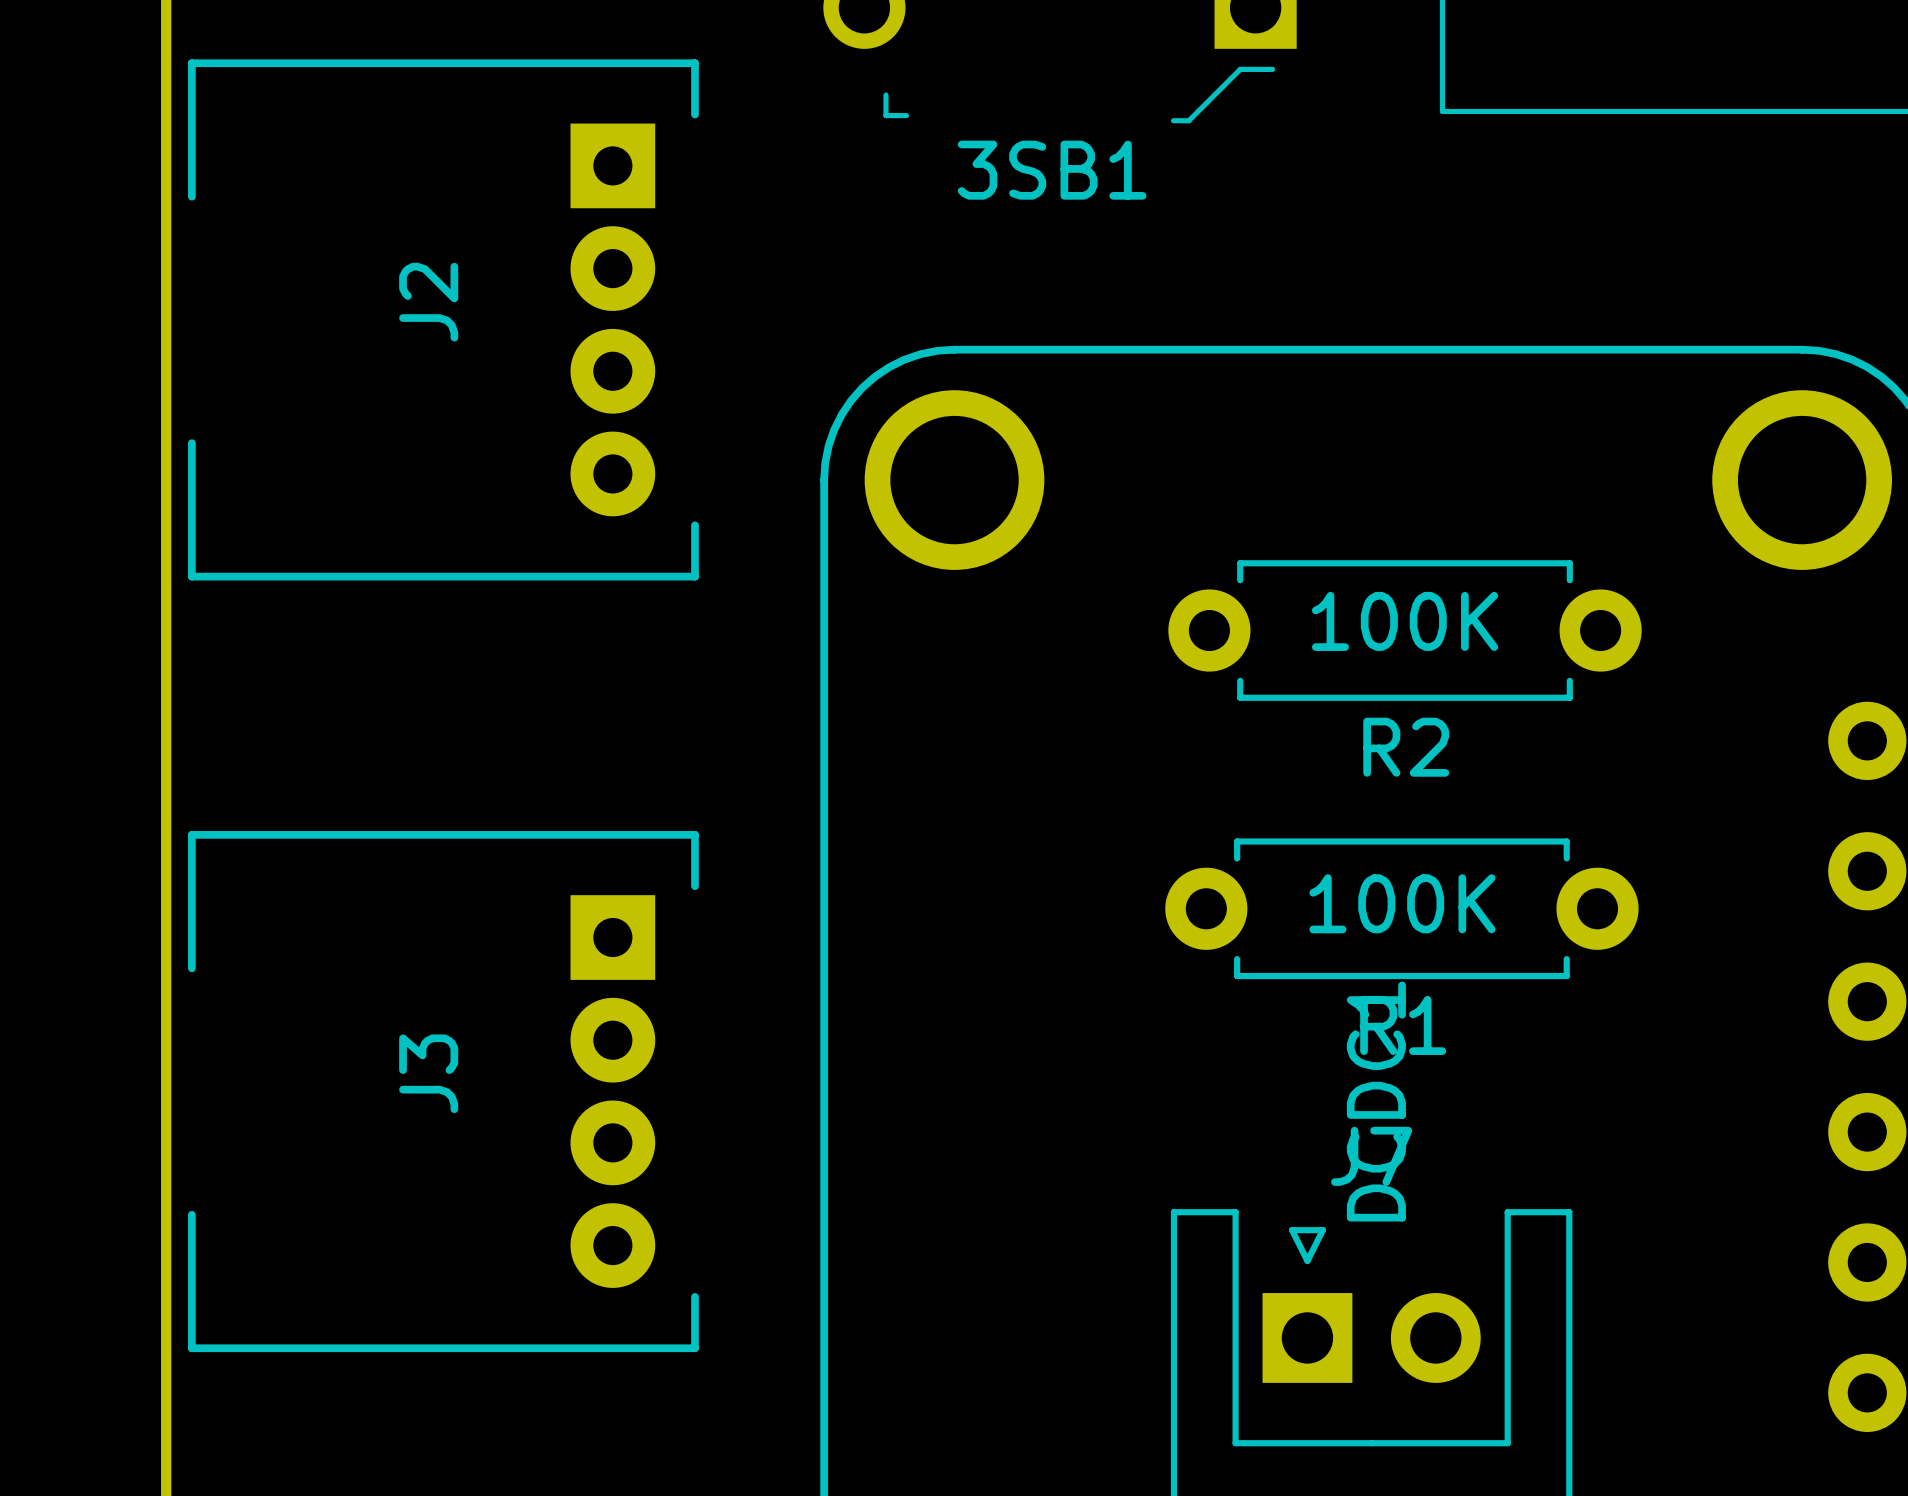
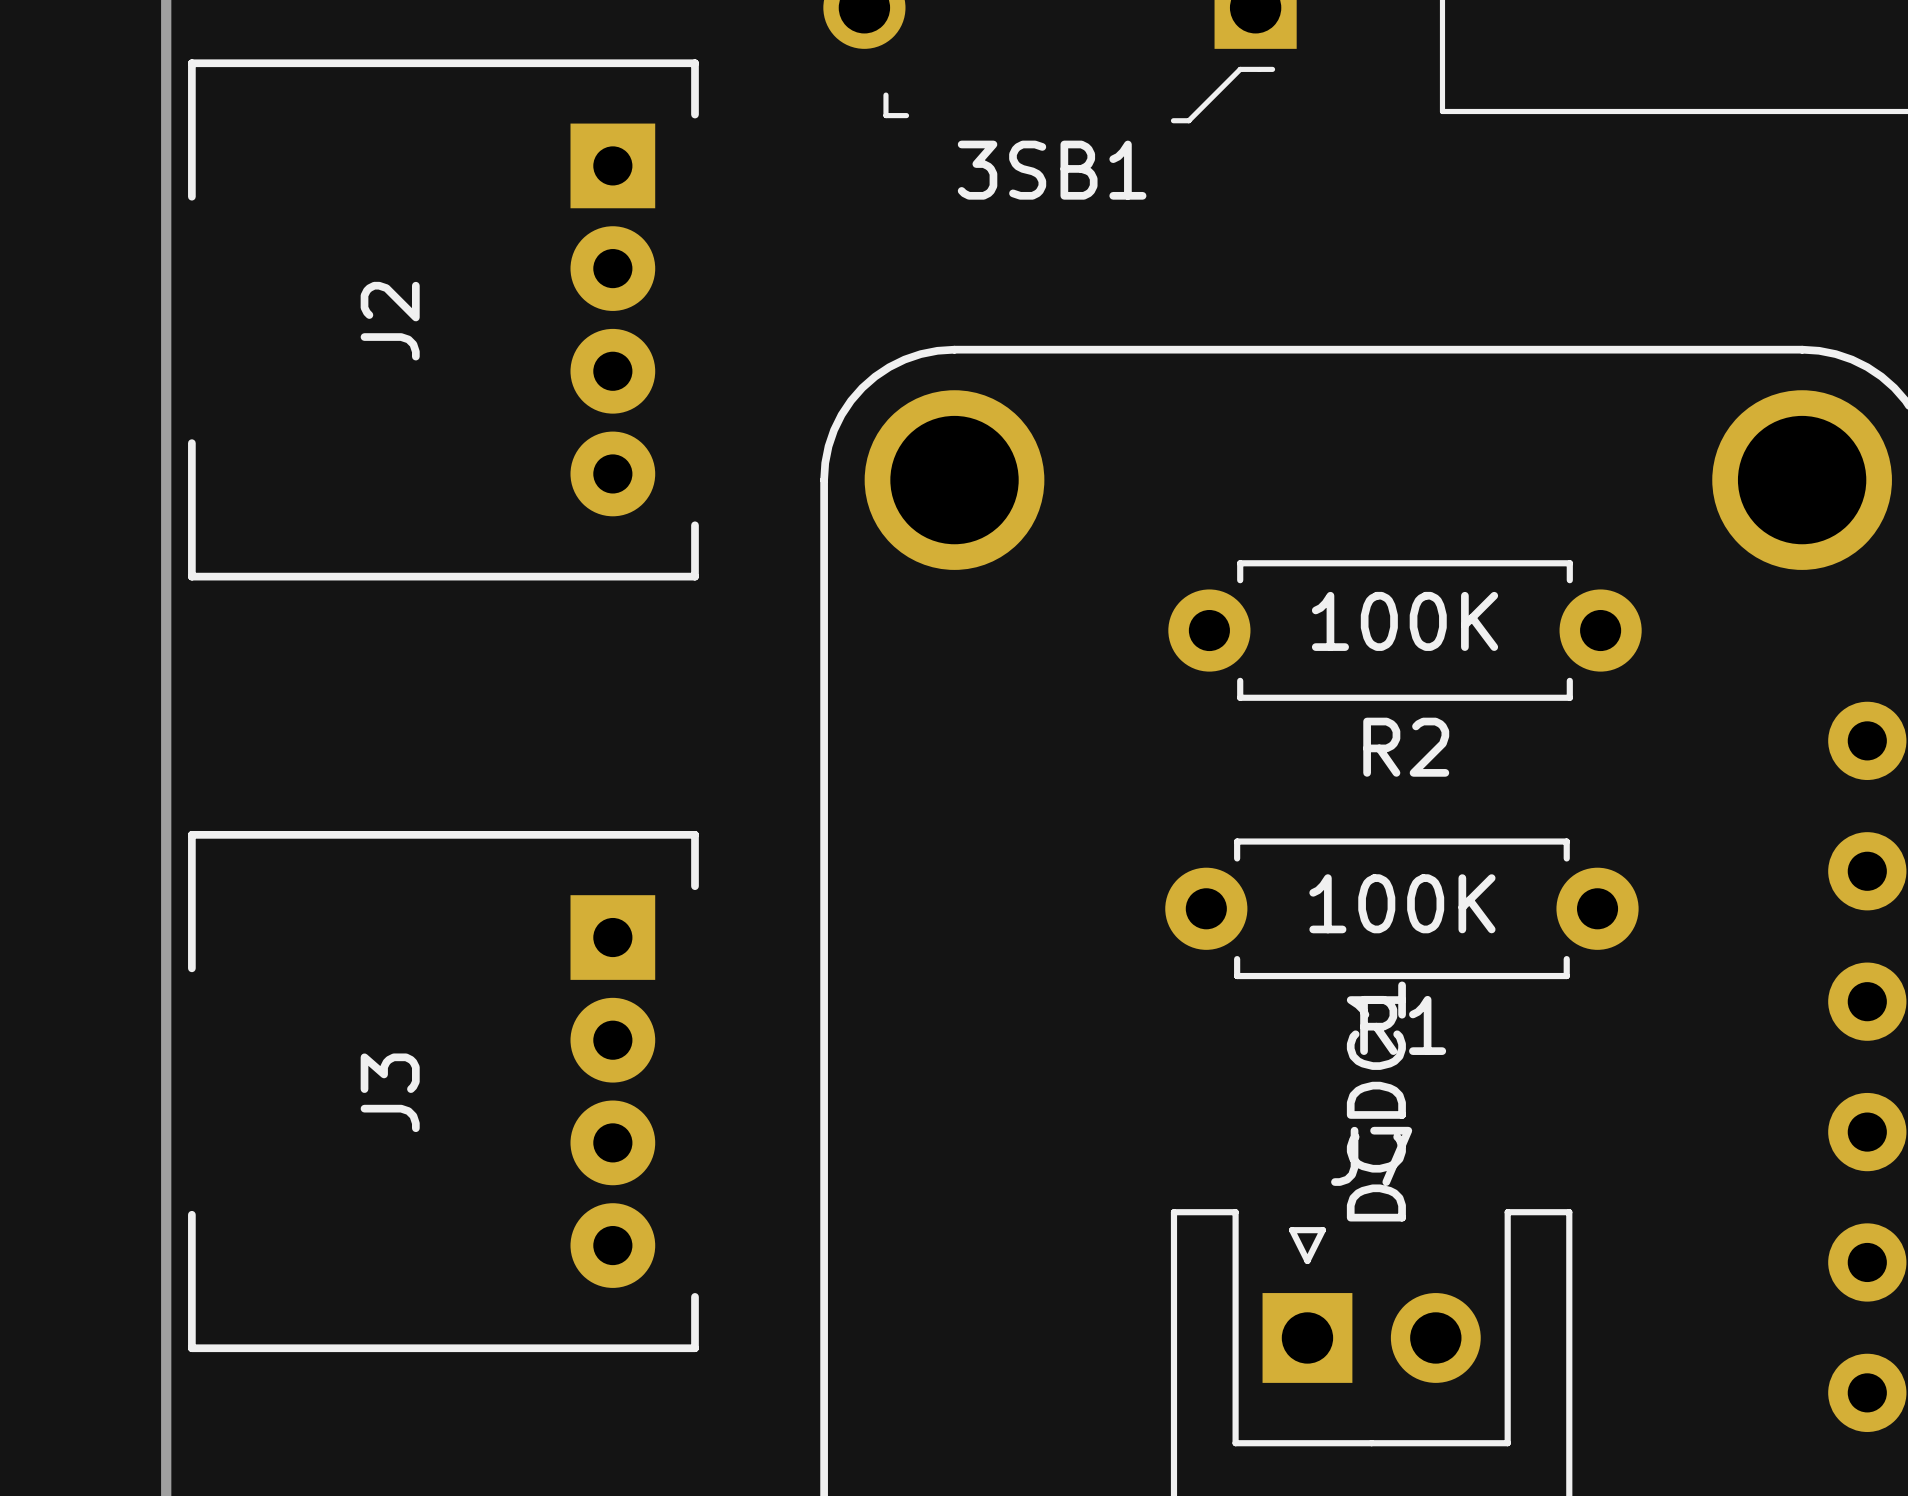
J2 name position: J2 (428, 302) -> J2 (390, 321)
J3 name position: J3 (428, 1073) -> J3 (390, 1092)

